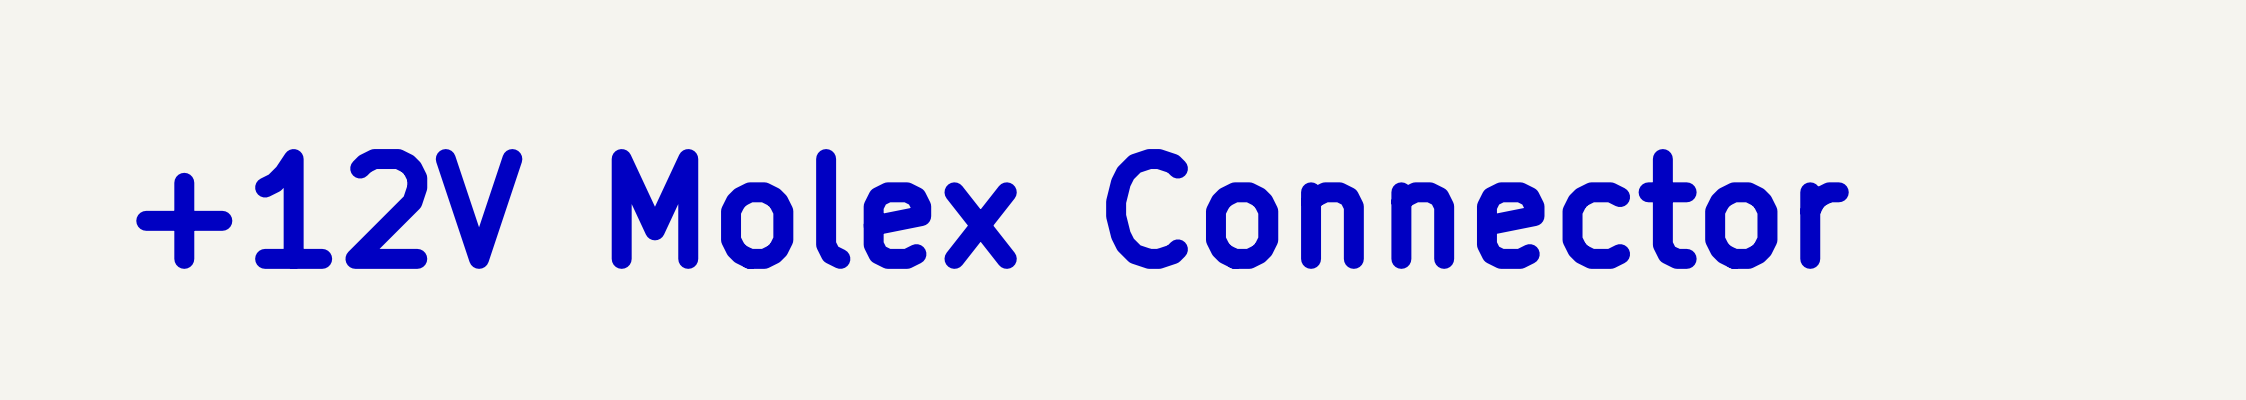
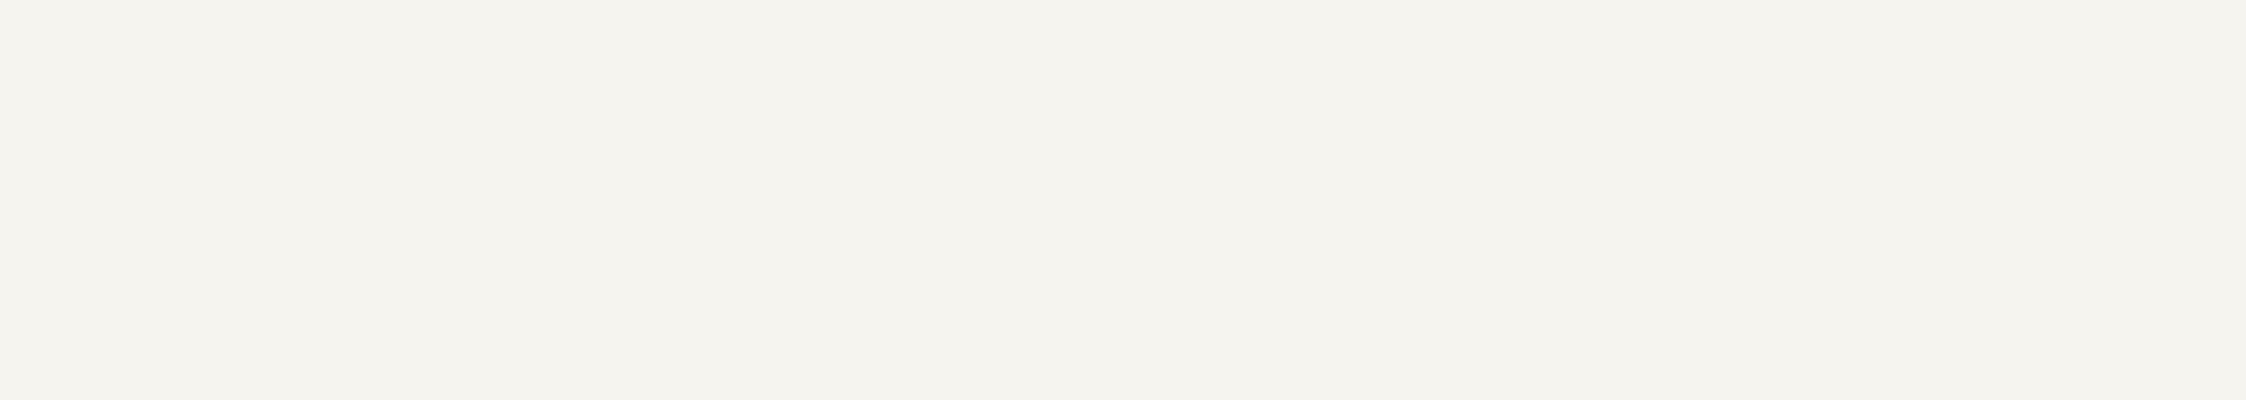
text: +12V Molex Connector (992, 208) -> none

